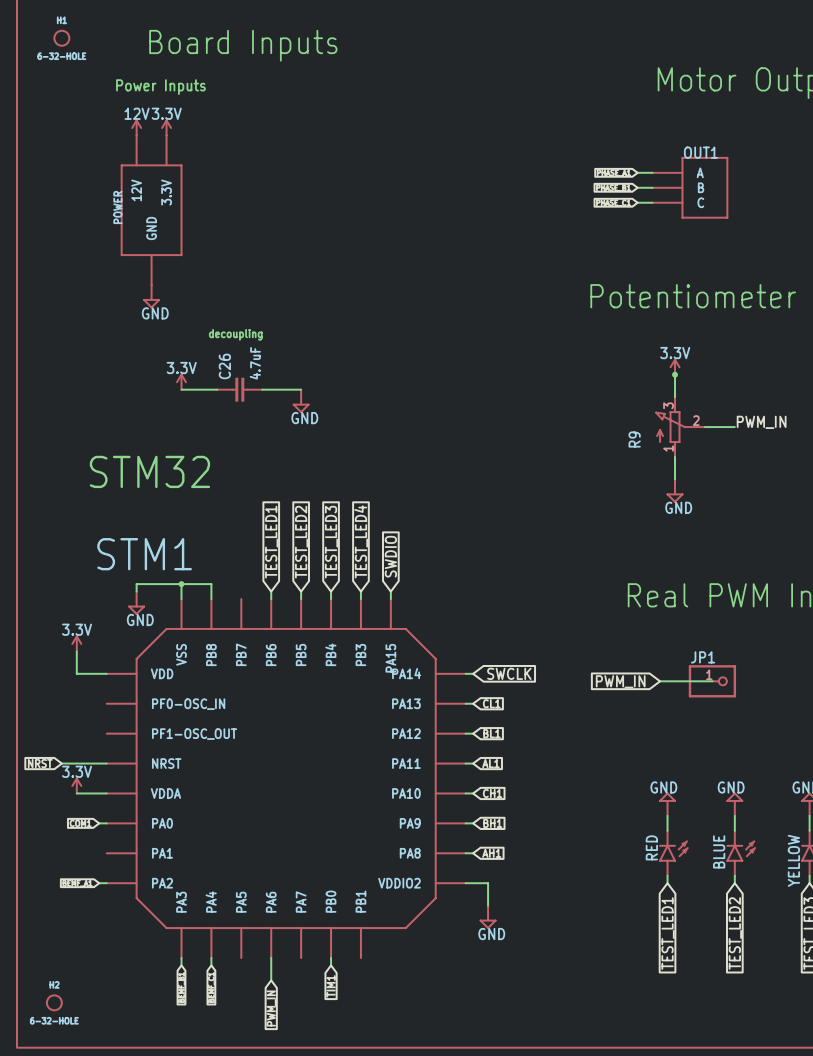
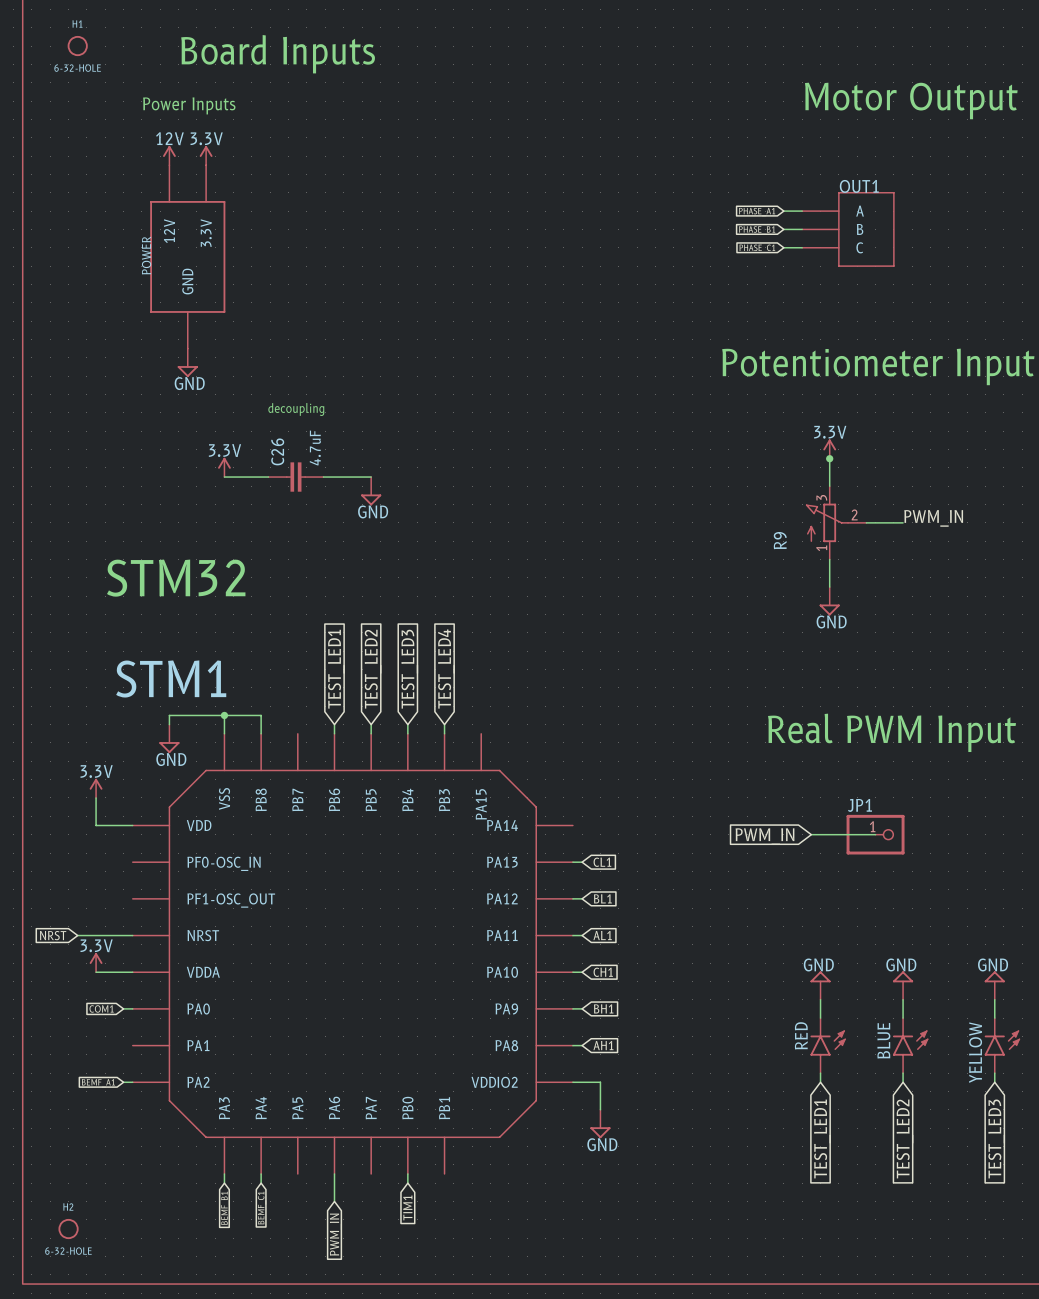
global label: SWDIO (390, 556) -> none
wire: (390, 591) (390, 599) -> none
wire: (465, 673) (473, 673) -> none
global label: SWCLK (509, 673) -> none

